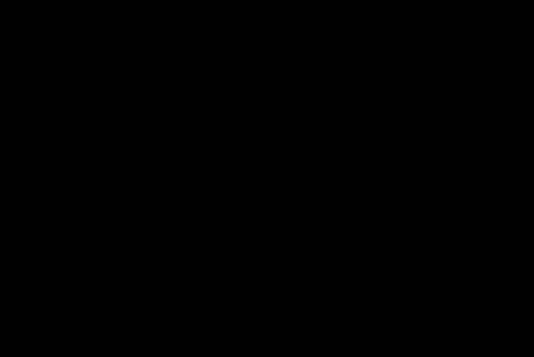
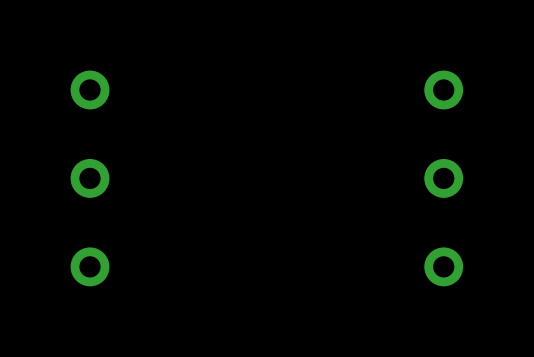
part: none -> (90, 178)
part: none -> (443, 178)

